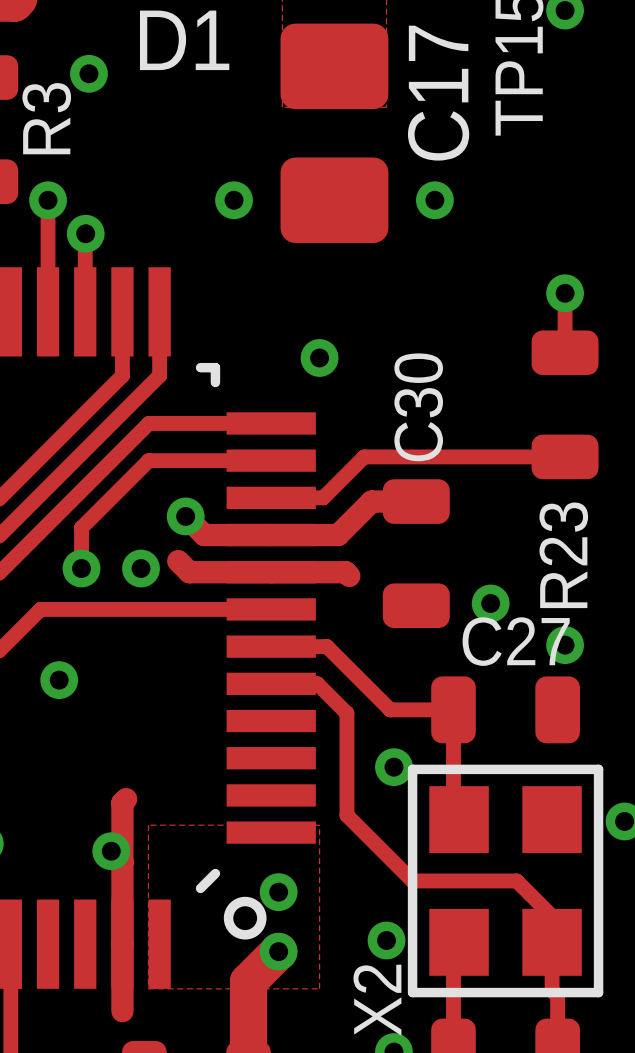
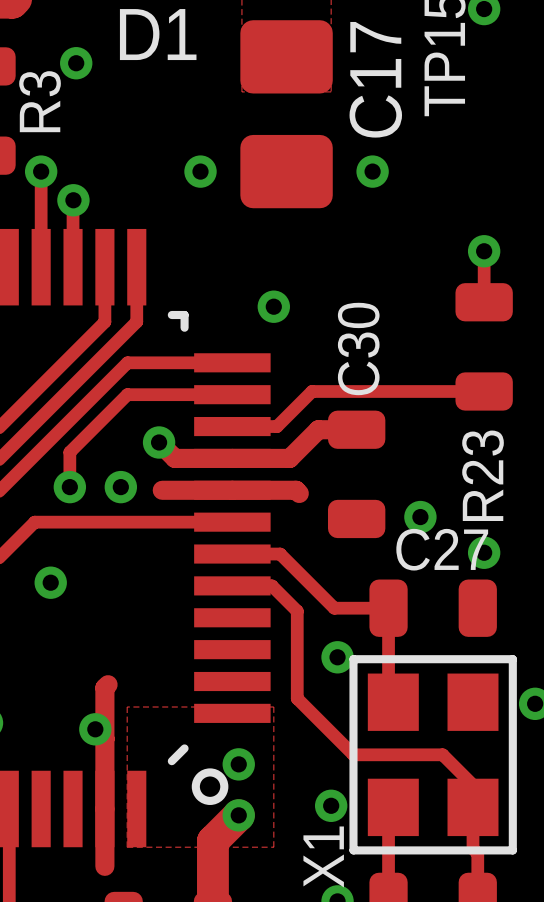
track: (178, 561) (189, 572) -> none
X2 name: X2 (377, 1000) -> X1 (323, 856)

